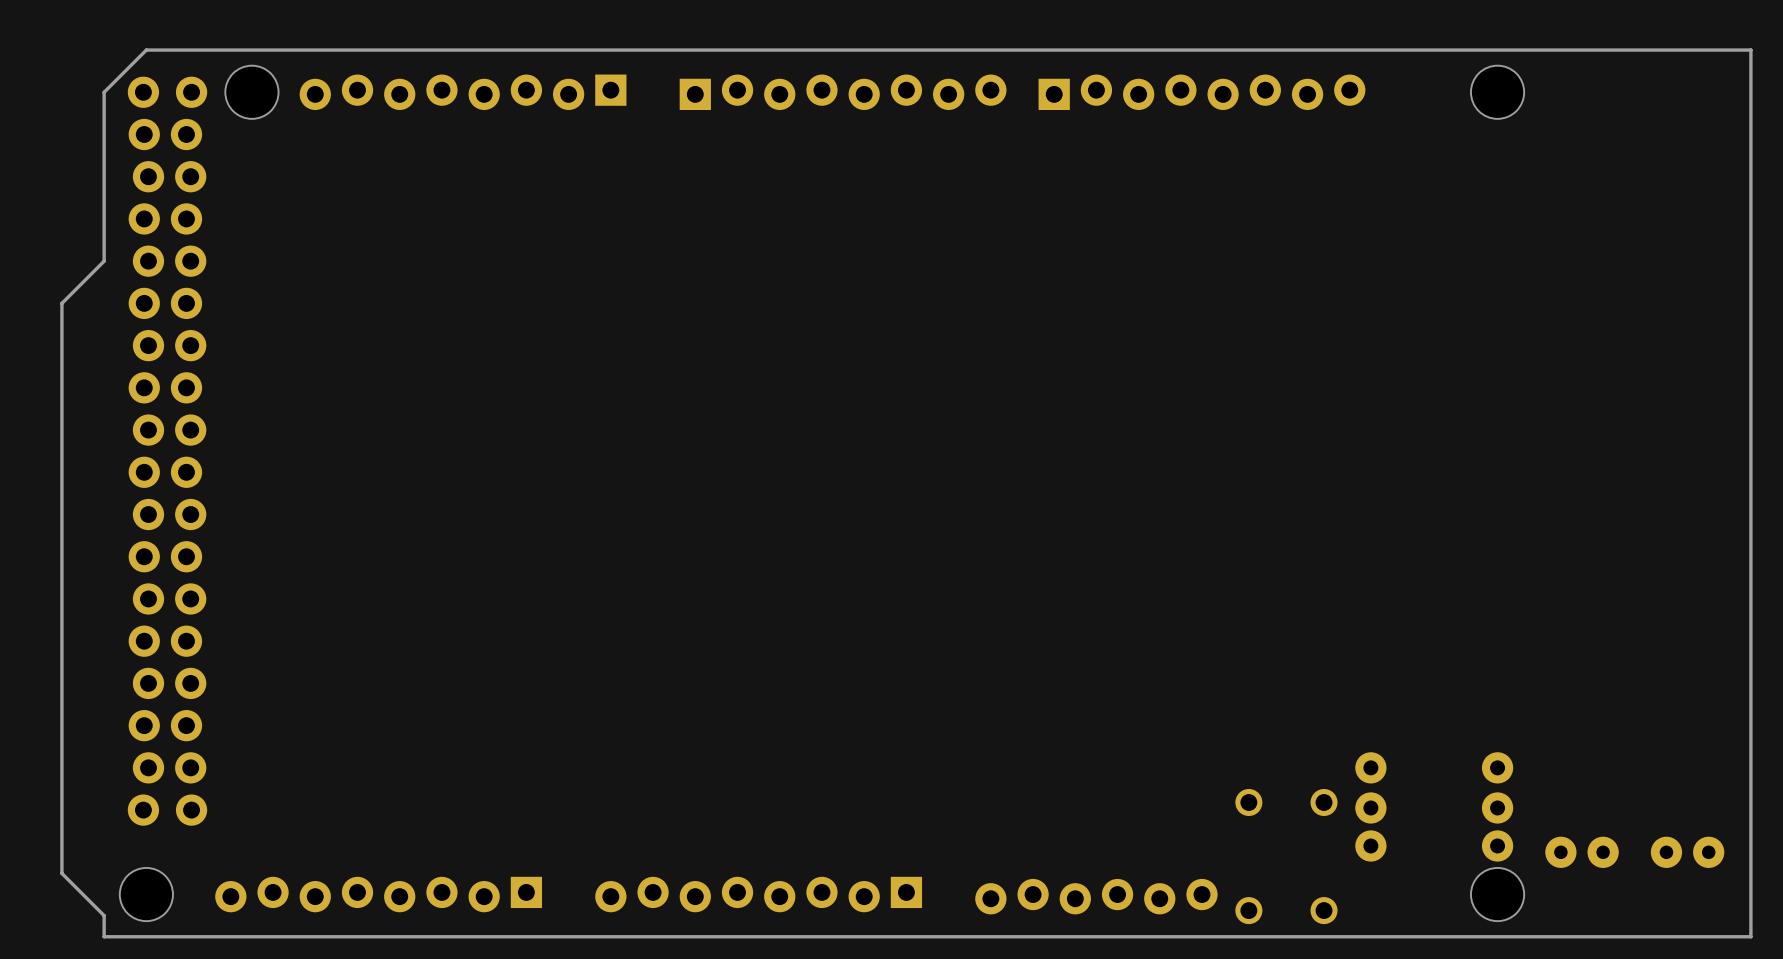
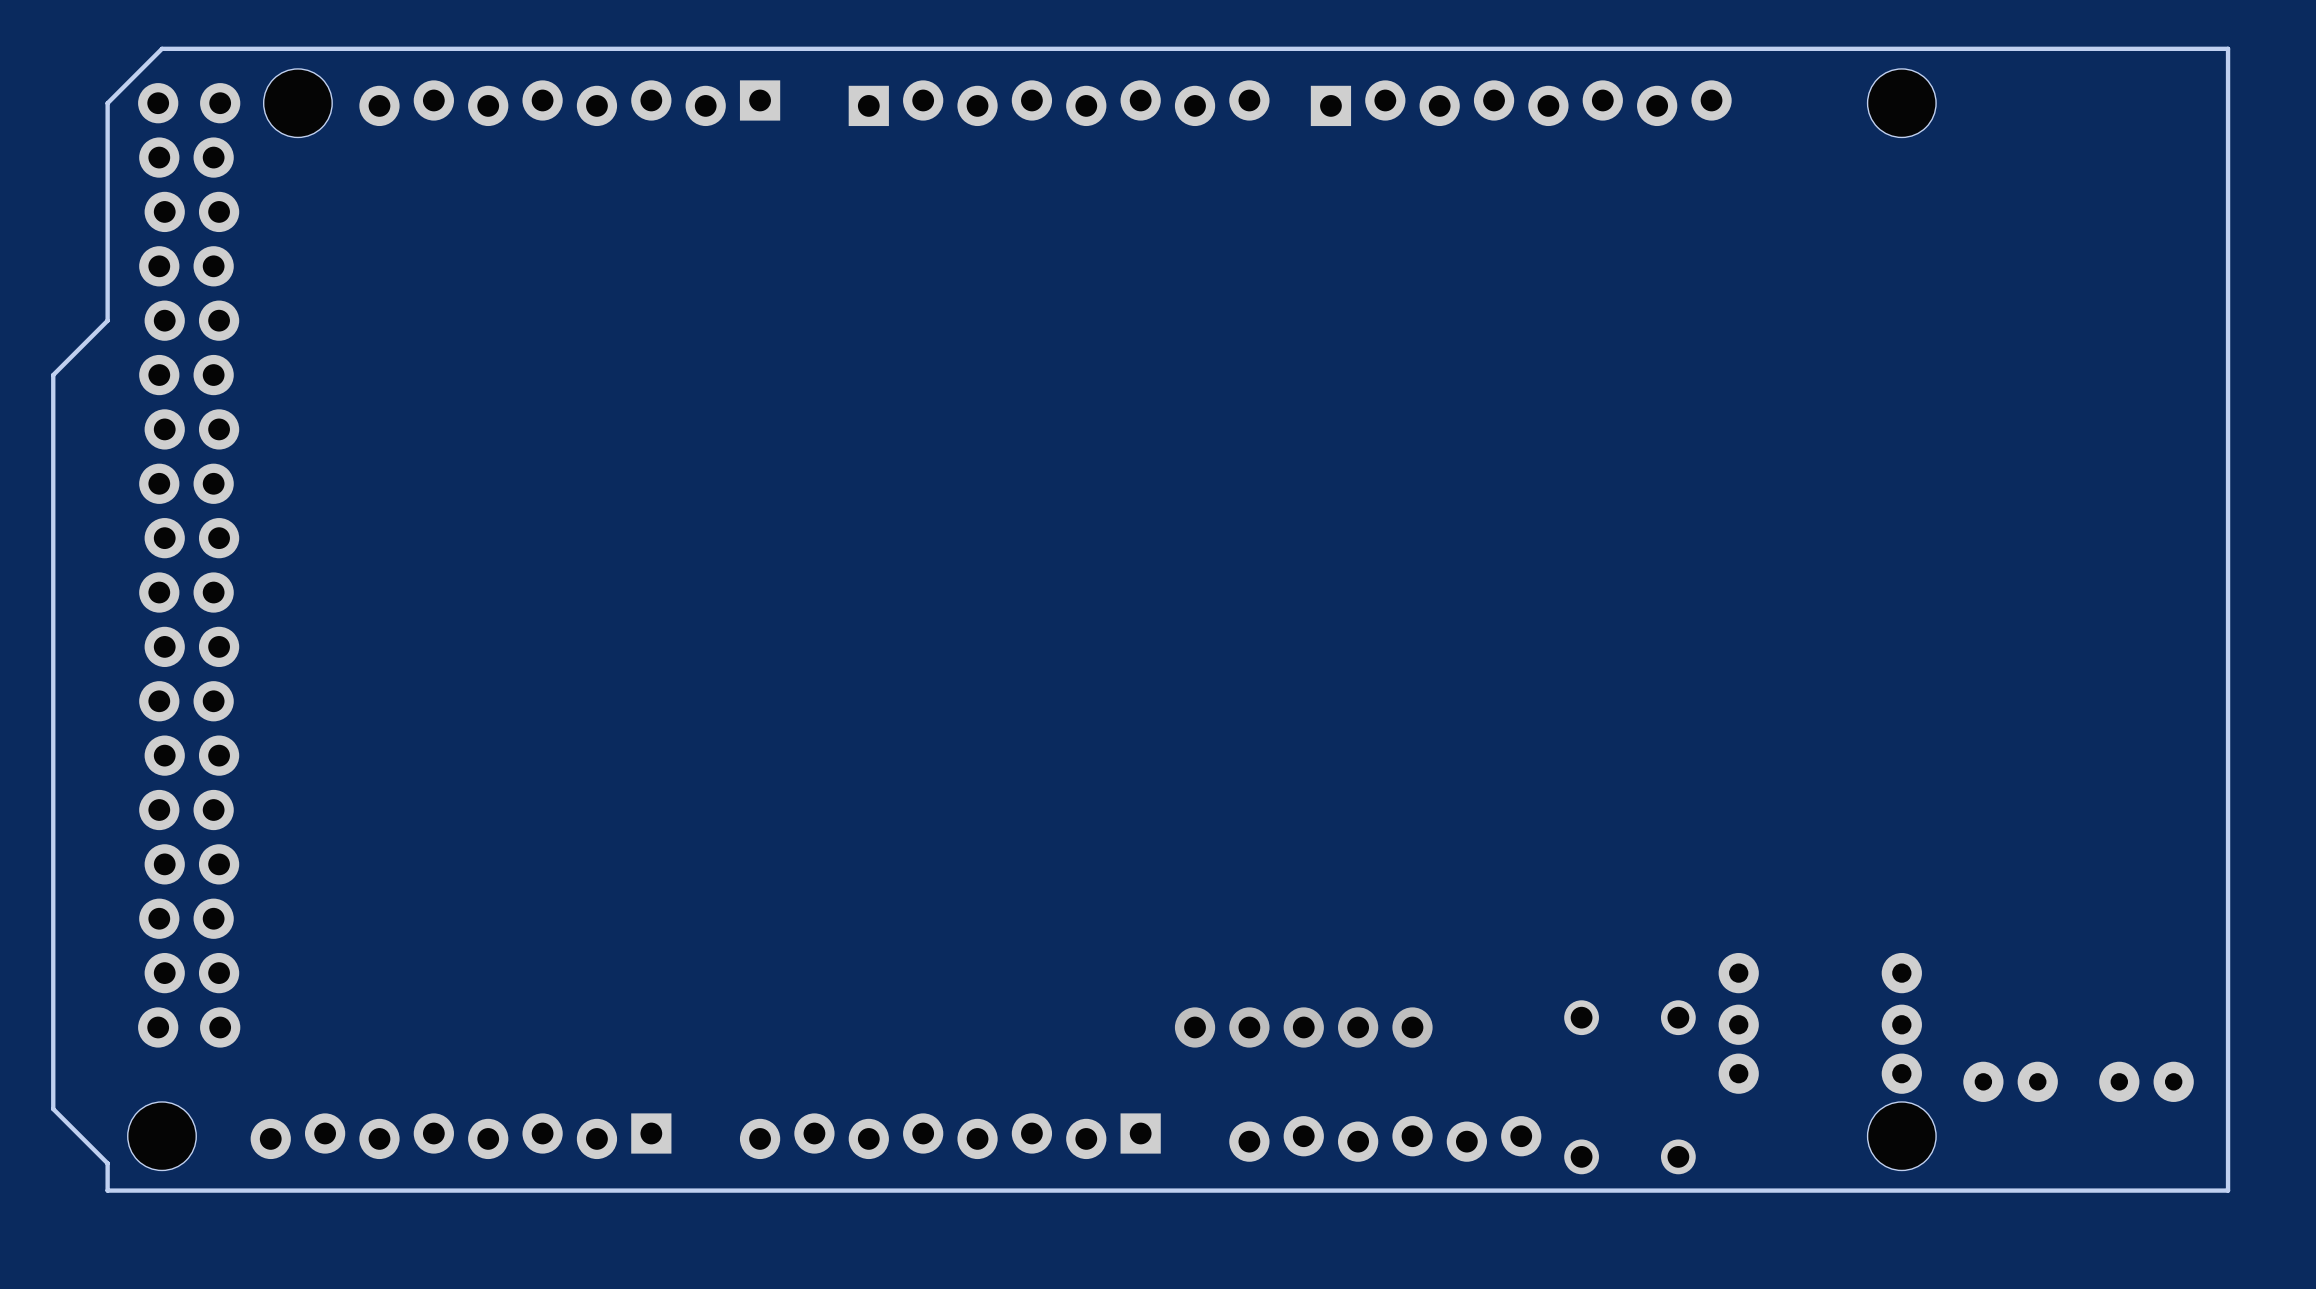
via: none -> (1195, 1027)
via: none -> (1249, 1027)
via: none -> (1303, 1027)
via: none -> (1358, 1027)
via: none -> (1412, 1027)

